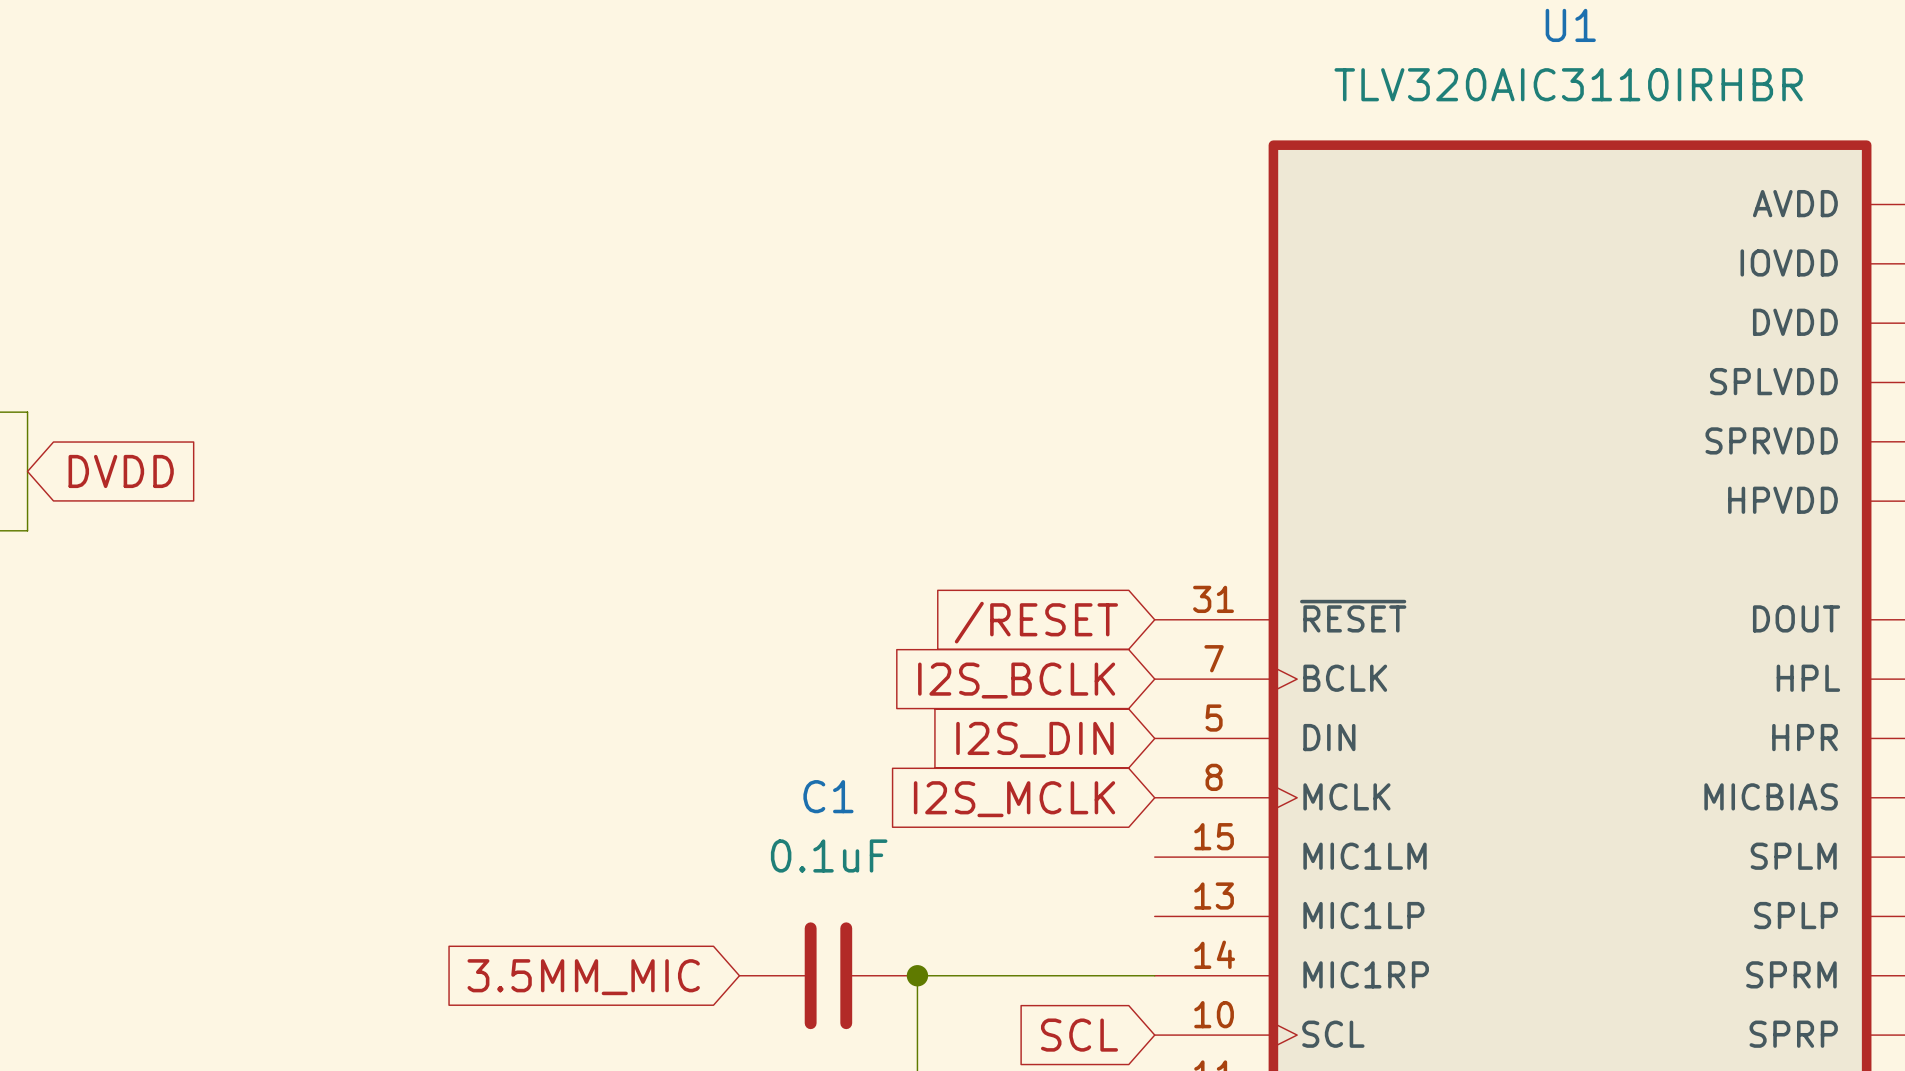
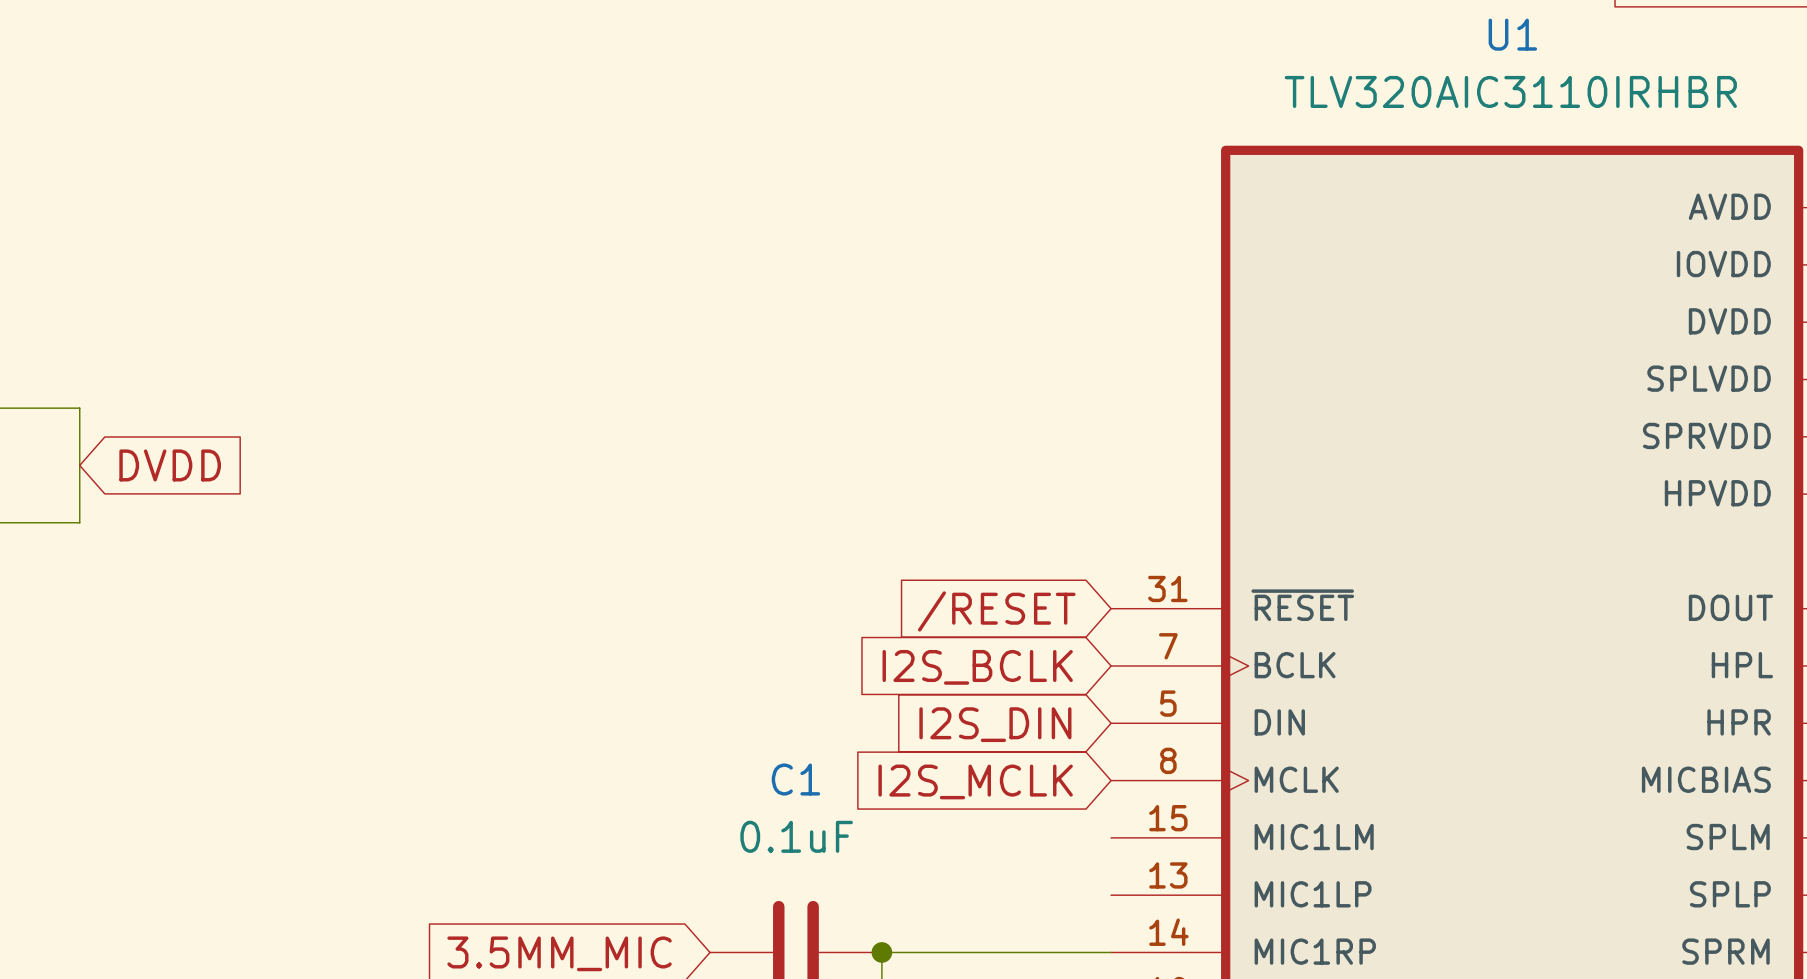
wire: (27, 412) (27, 530) -> (22, 408) (79, 408) (79, 522) (22, 522)
global label position: DVDD (121, 471) -> DVDD (170, 465)

